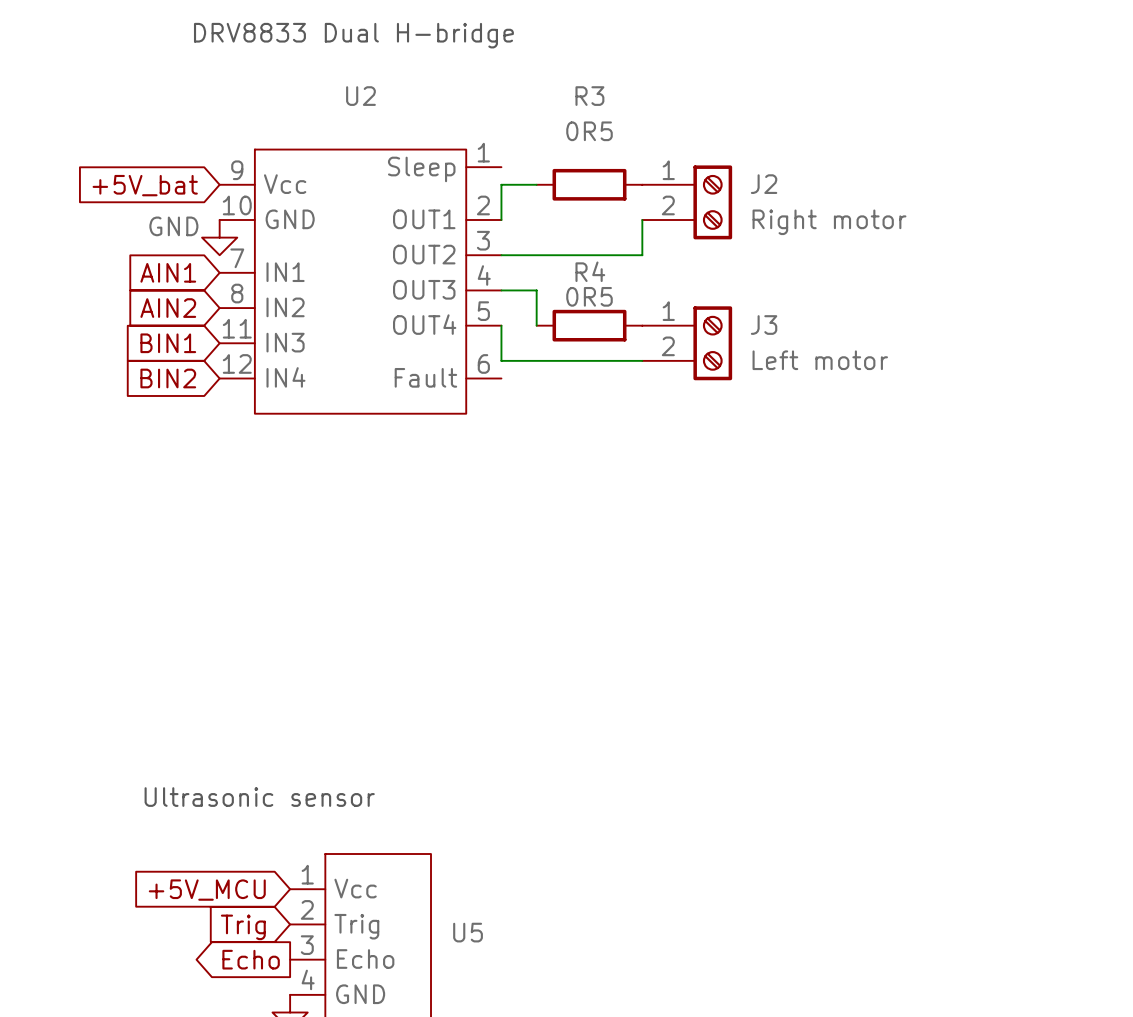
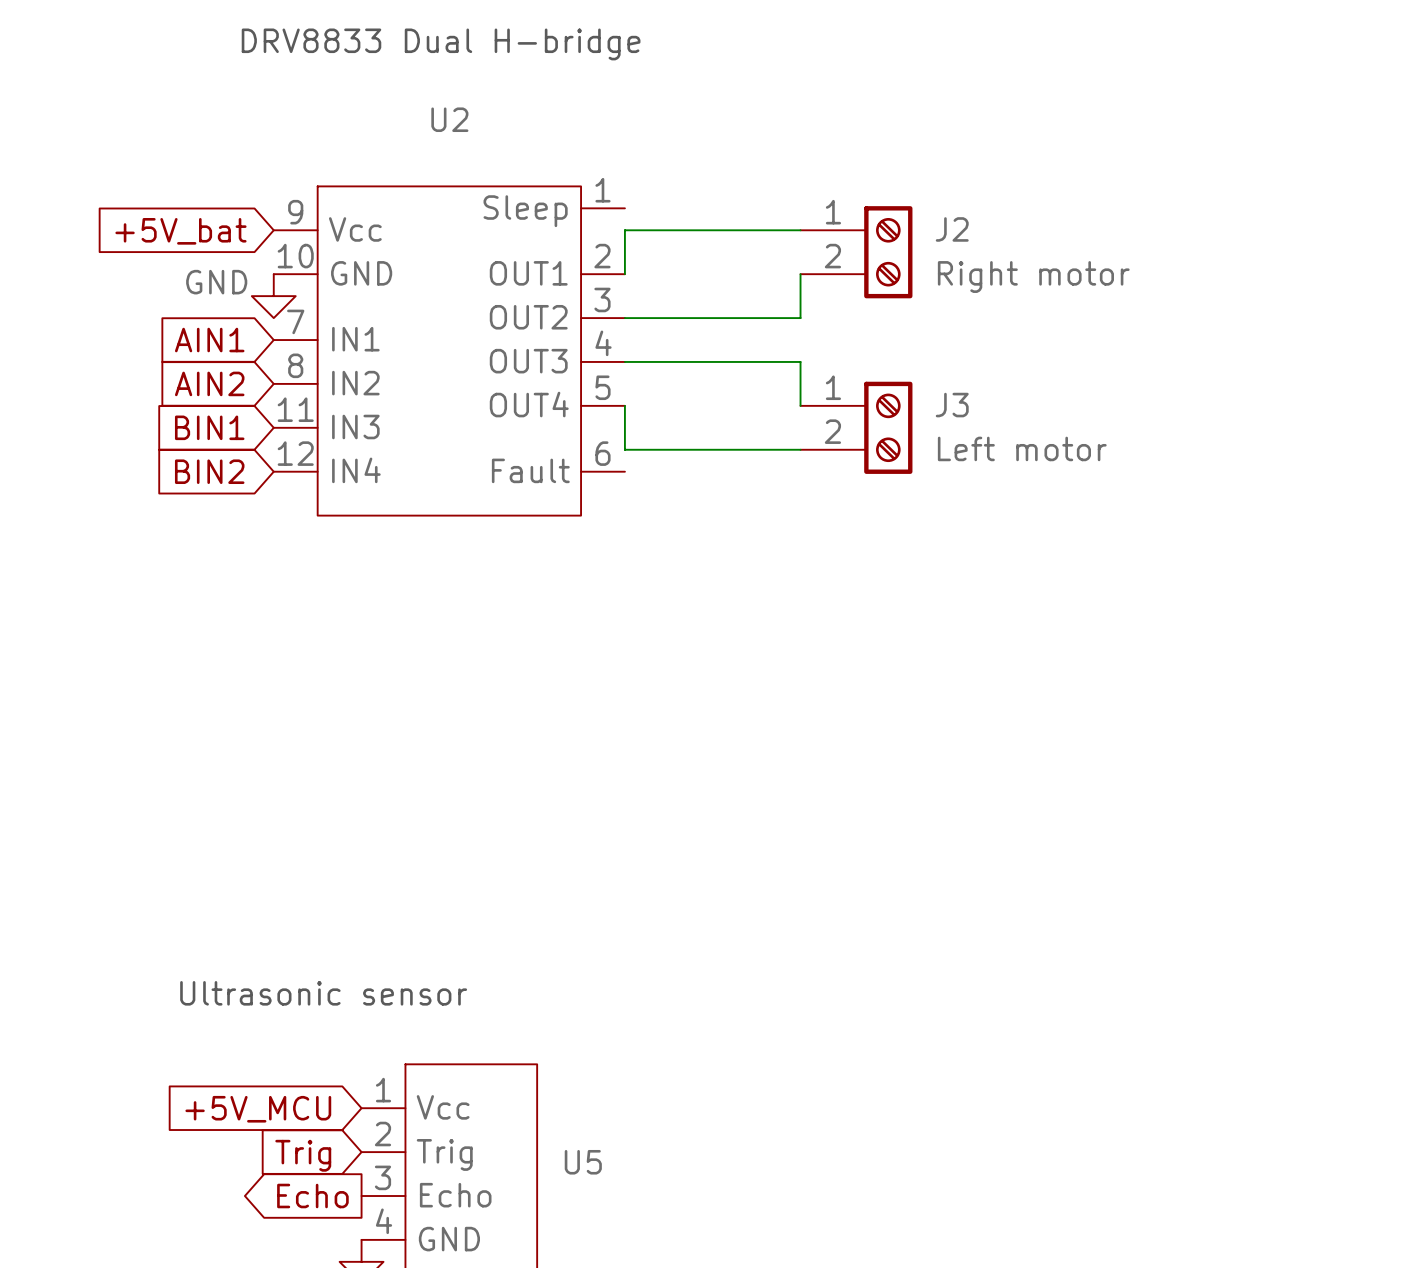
wire: none -> (668, 230) (800, 230)
R3: 0R5 (589, 184) -> none
wire: (536, 290) (536, 325) -> (668, 361) (800, 361) (800, 405)
R4: 0R5 (589, 325) -> none

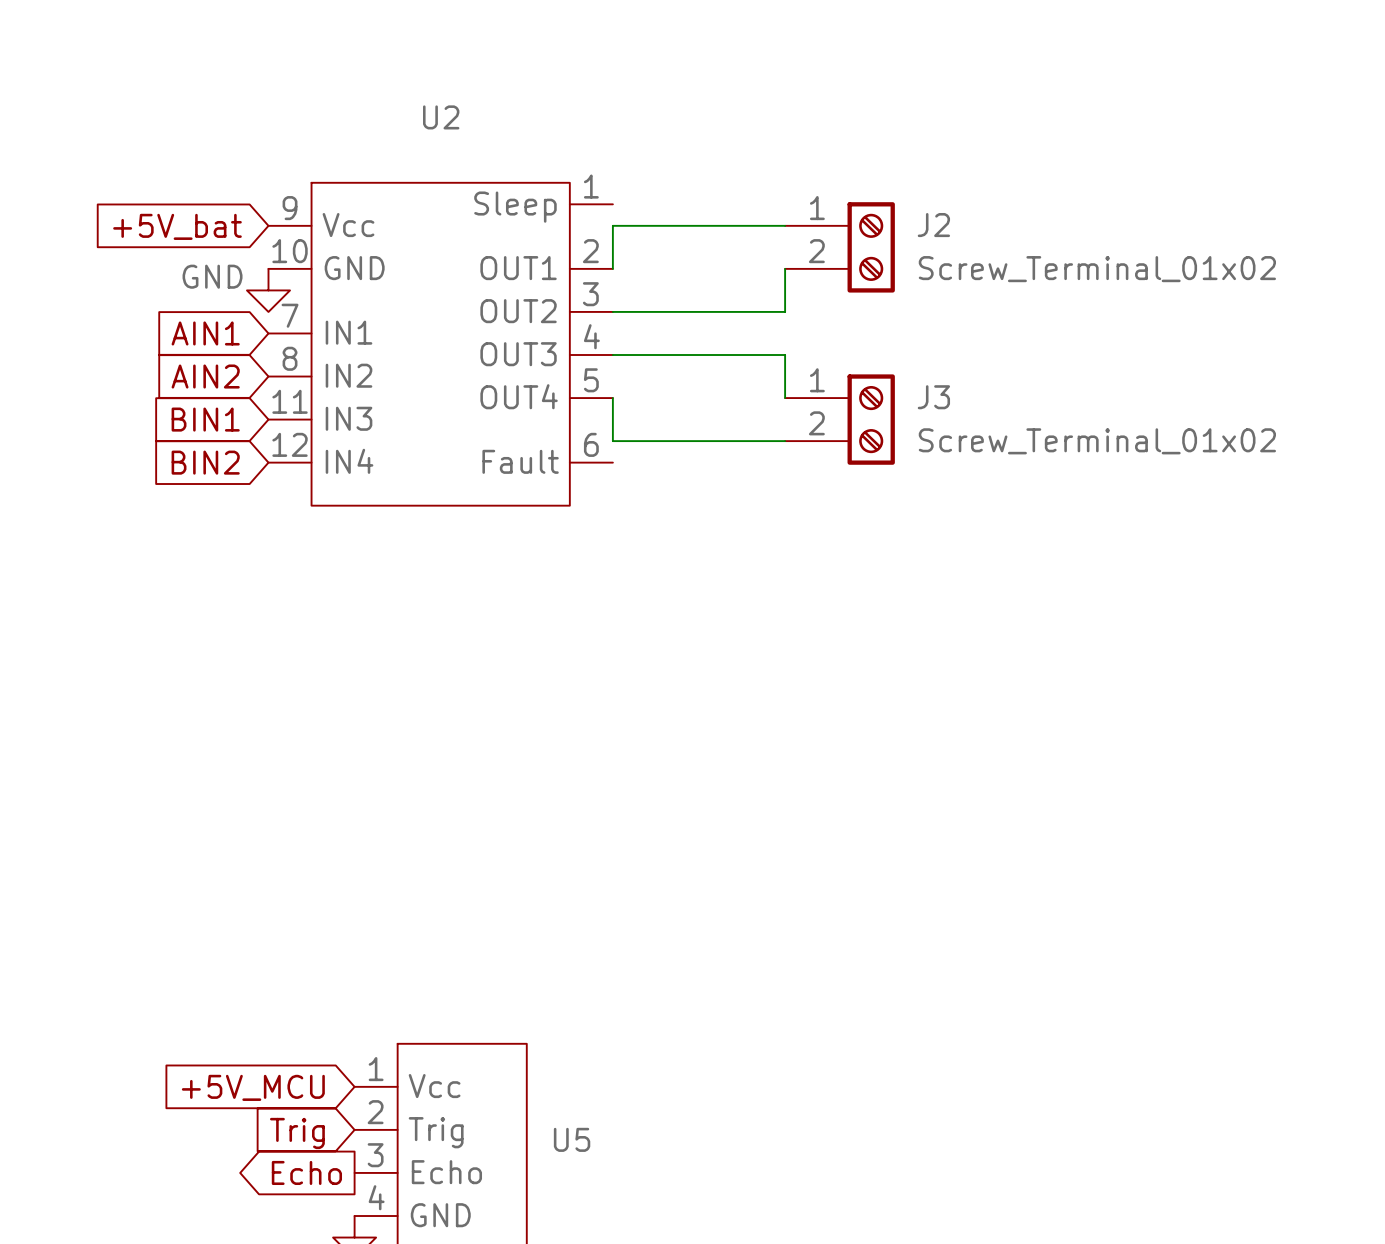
text: DRV8833 Dual H-bridge (441, 44) -> none
J2 value: Right motor (1033, 277) -> Screw_Terminal_01x02 (1097, 269)
J3 value: Left motor (1022, 448) -> Screw_Terminal_01x02 (1097, 441)
text: Ultrasonic sensor (323, 993) -> none

